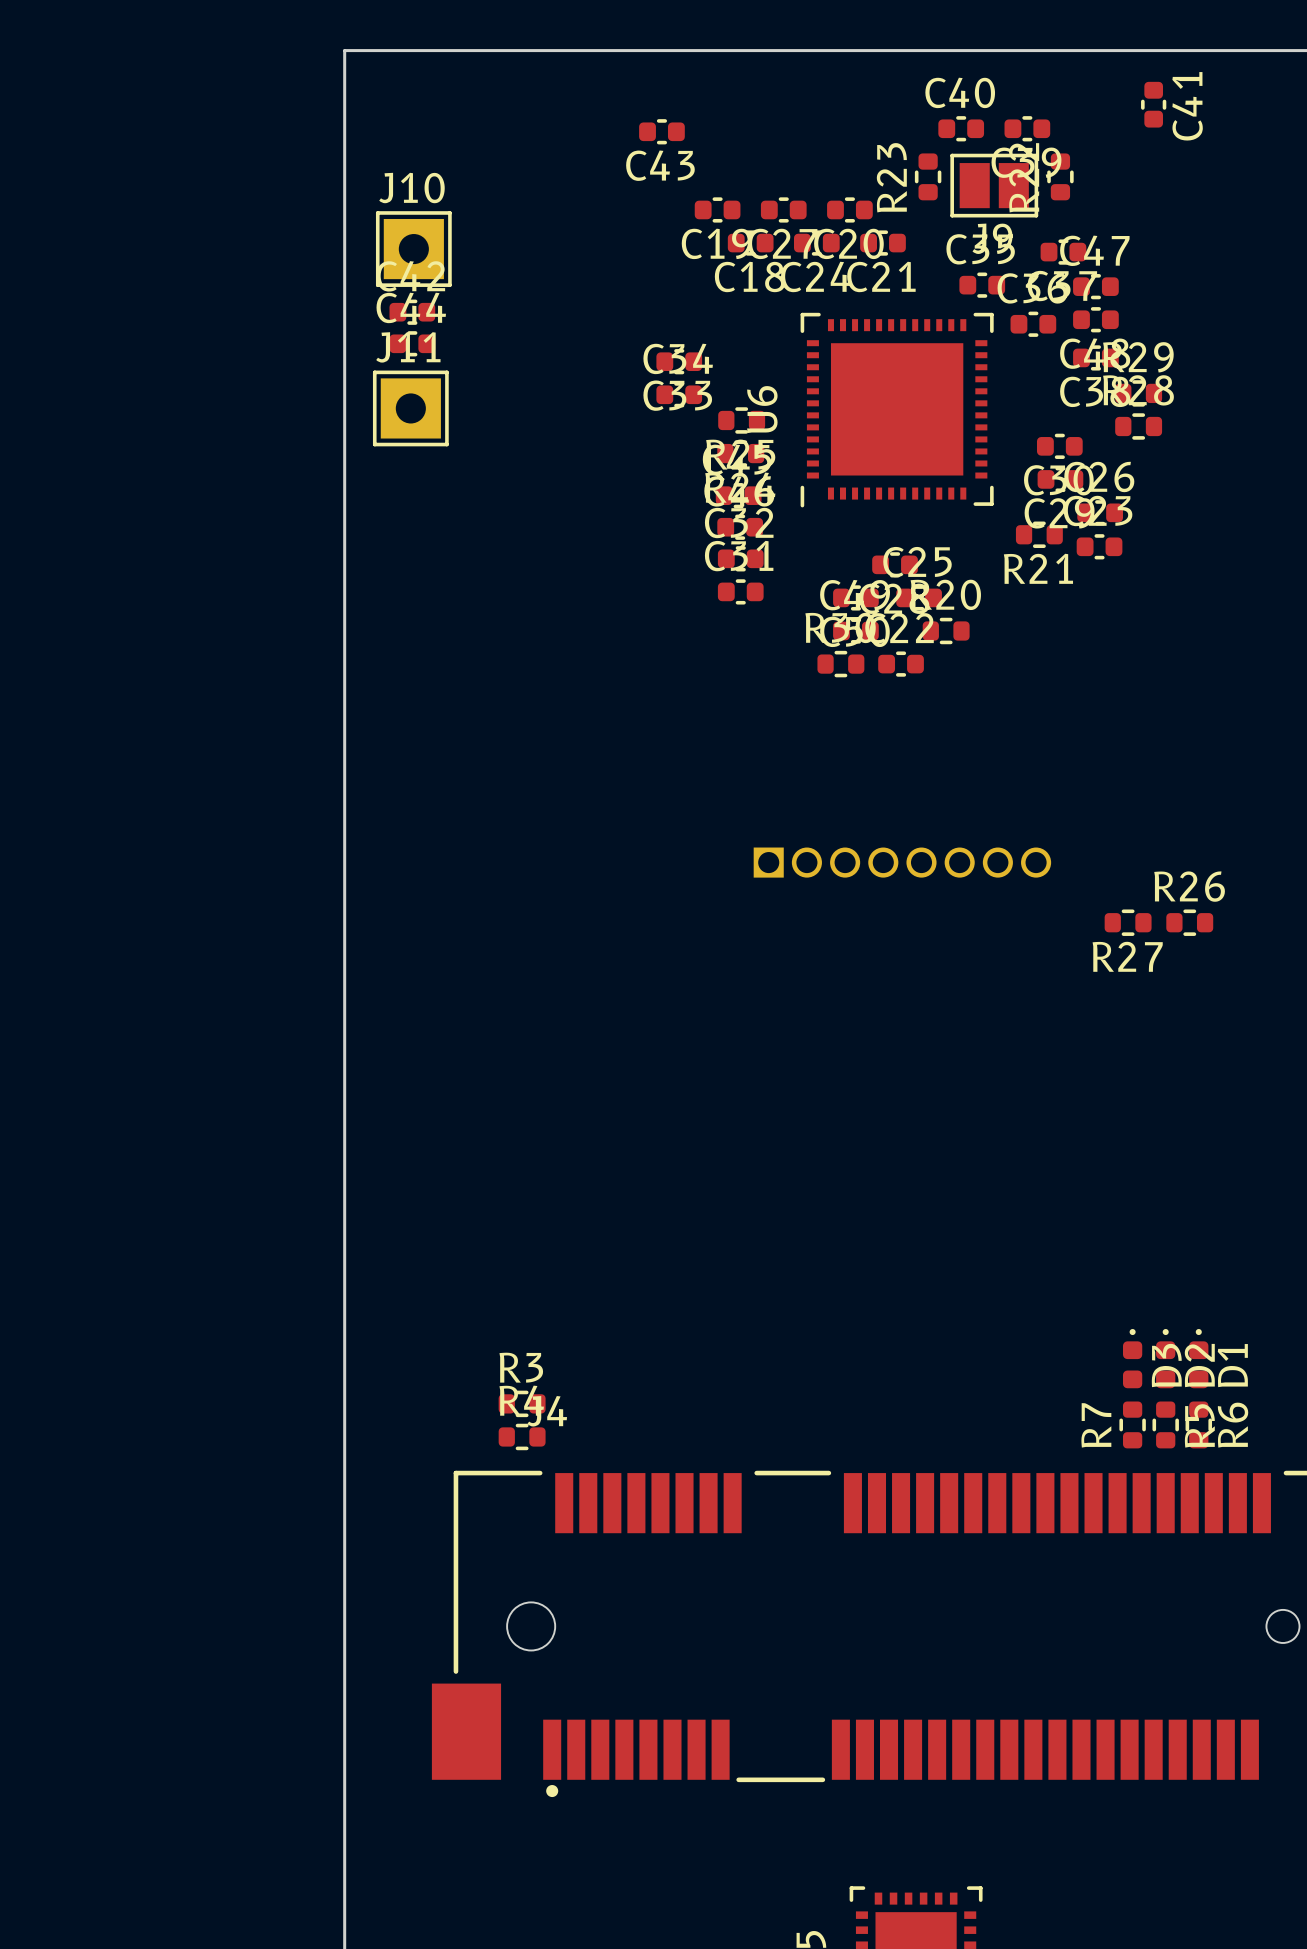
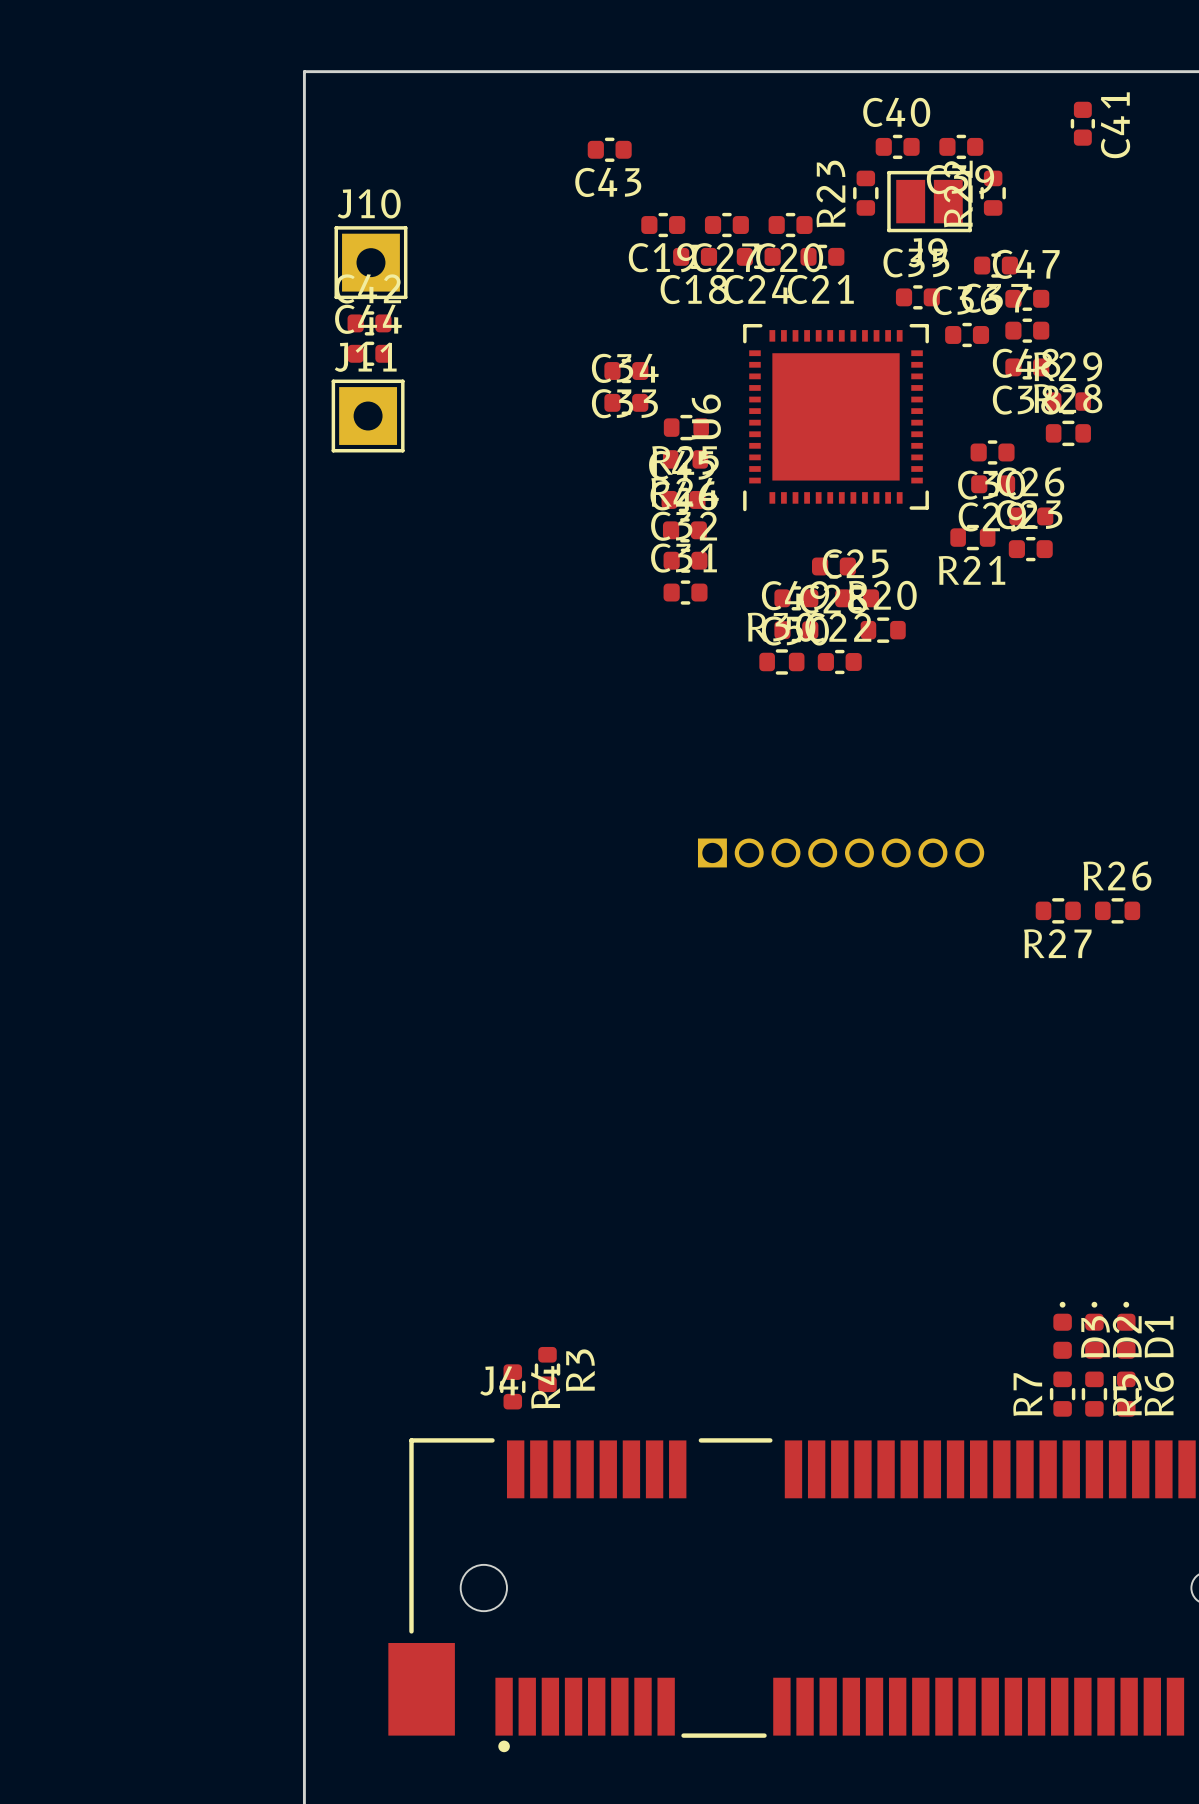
R3 rotation: 0° (522, 1403) -> 90° clockwise (547, 1369)
R3 position: (522, 1403) -> (547, 1369)
R4 rotation: 0° (522, 1436) -> 90° clockwise (512, 1386)
R4 position: (522, 1436) -> (512, 1386)

